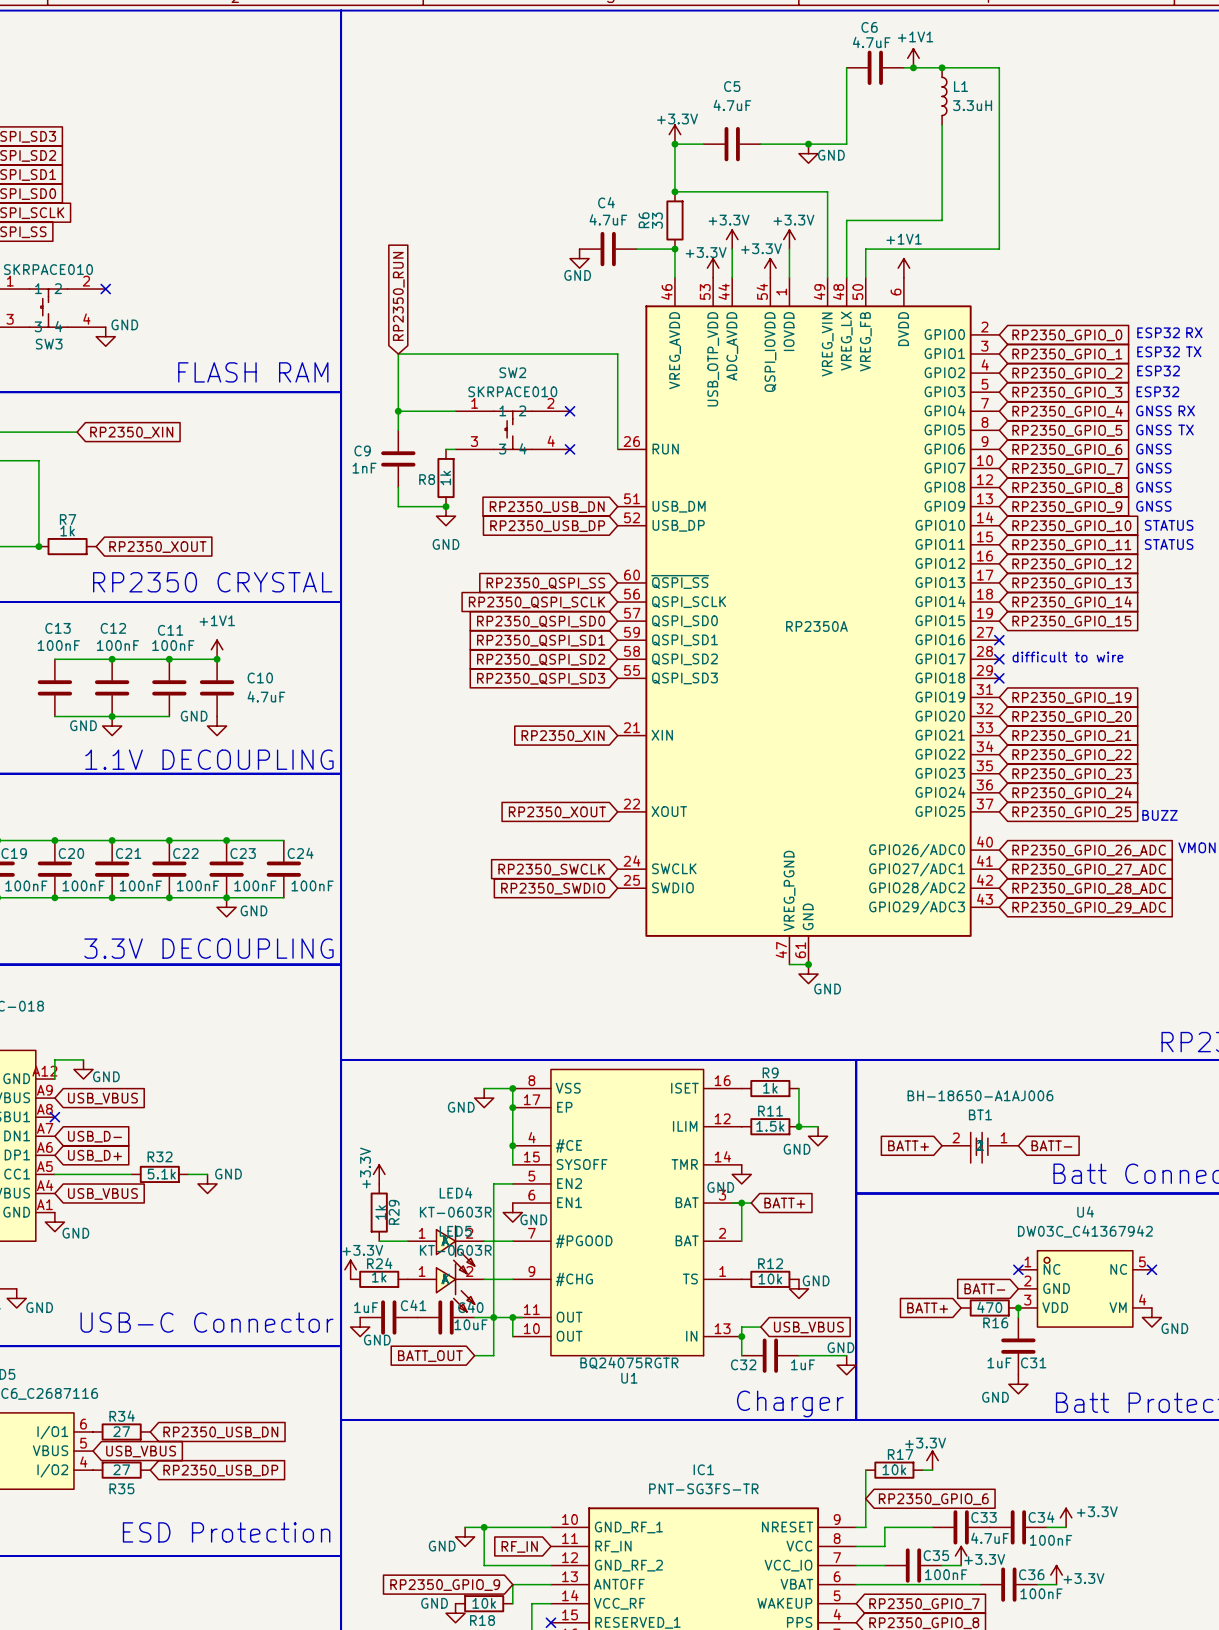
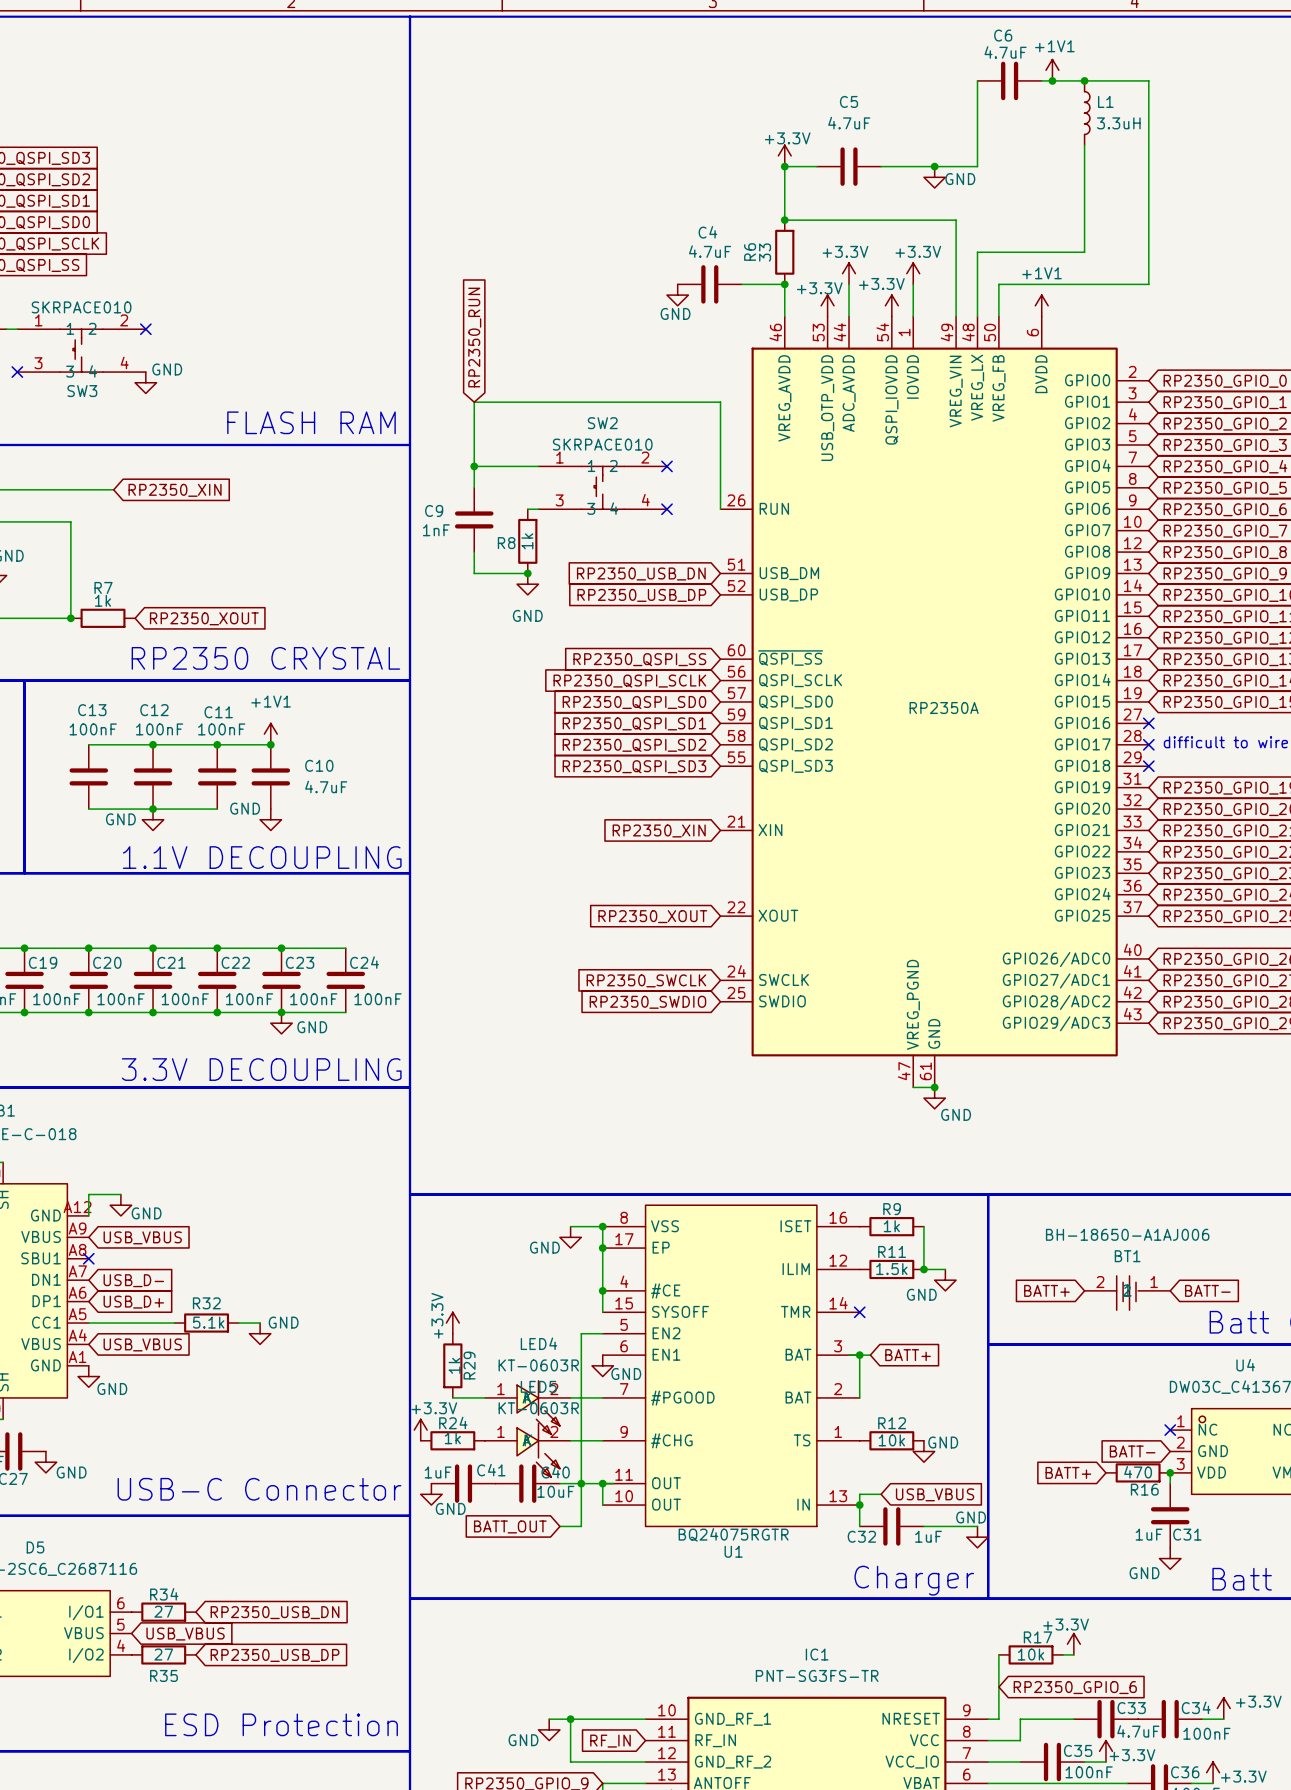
no-connect mark: none -> (859, 1312)
power symbol: GND (741, 1174) -> none

